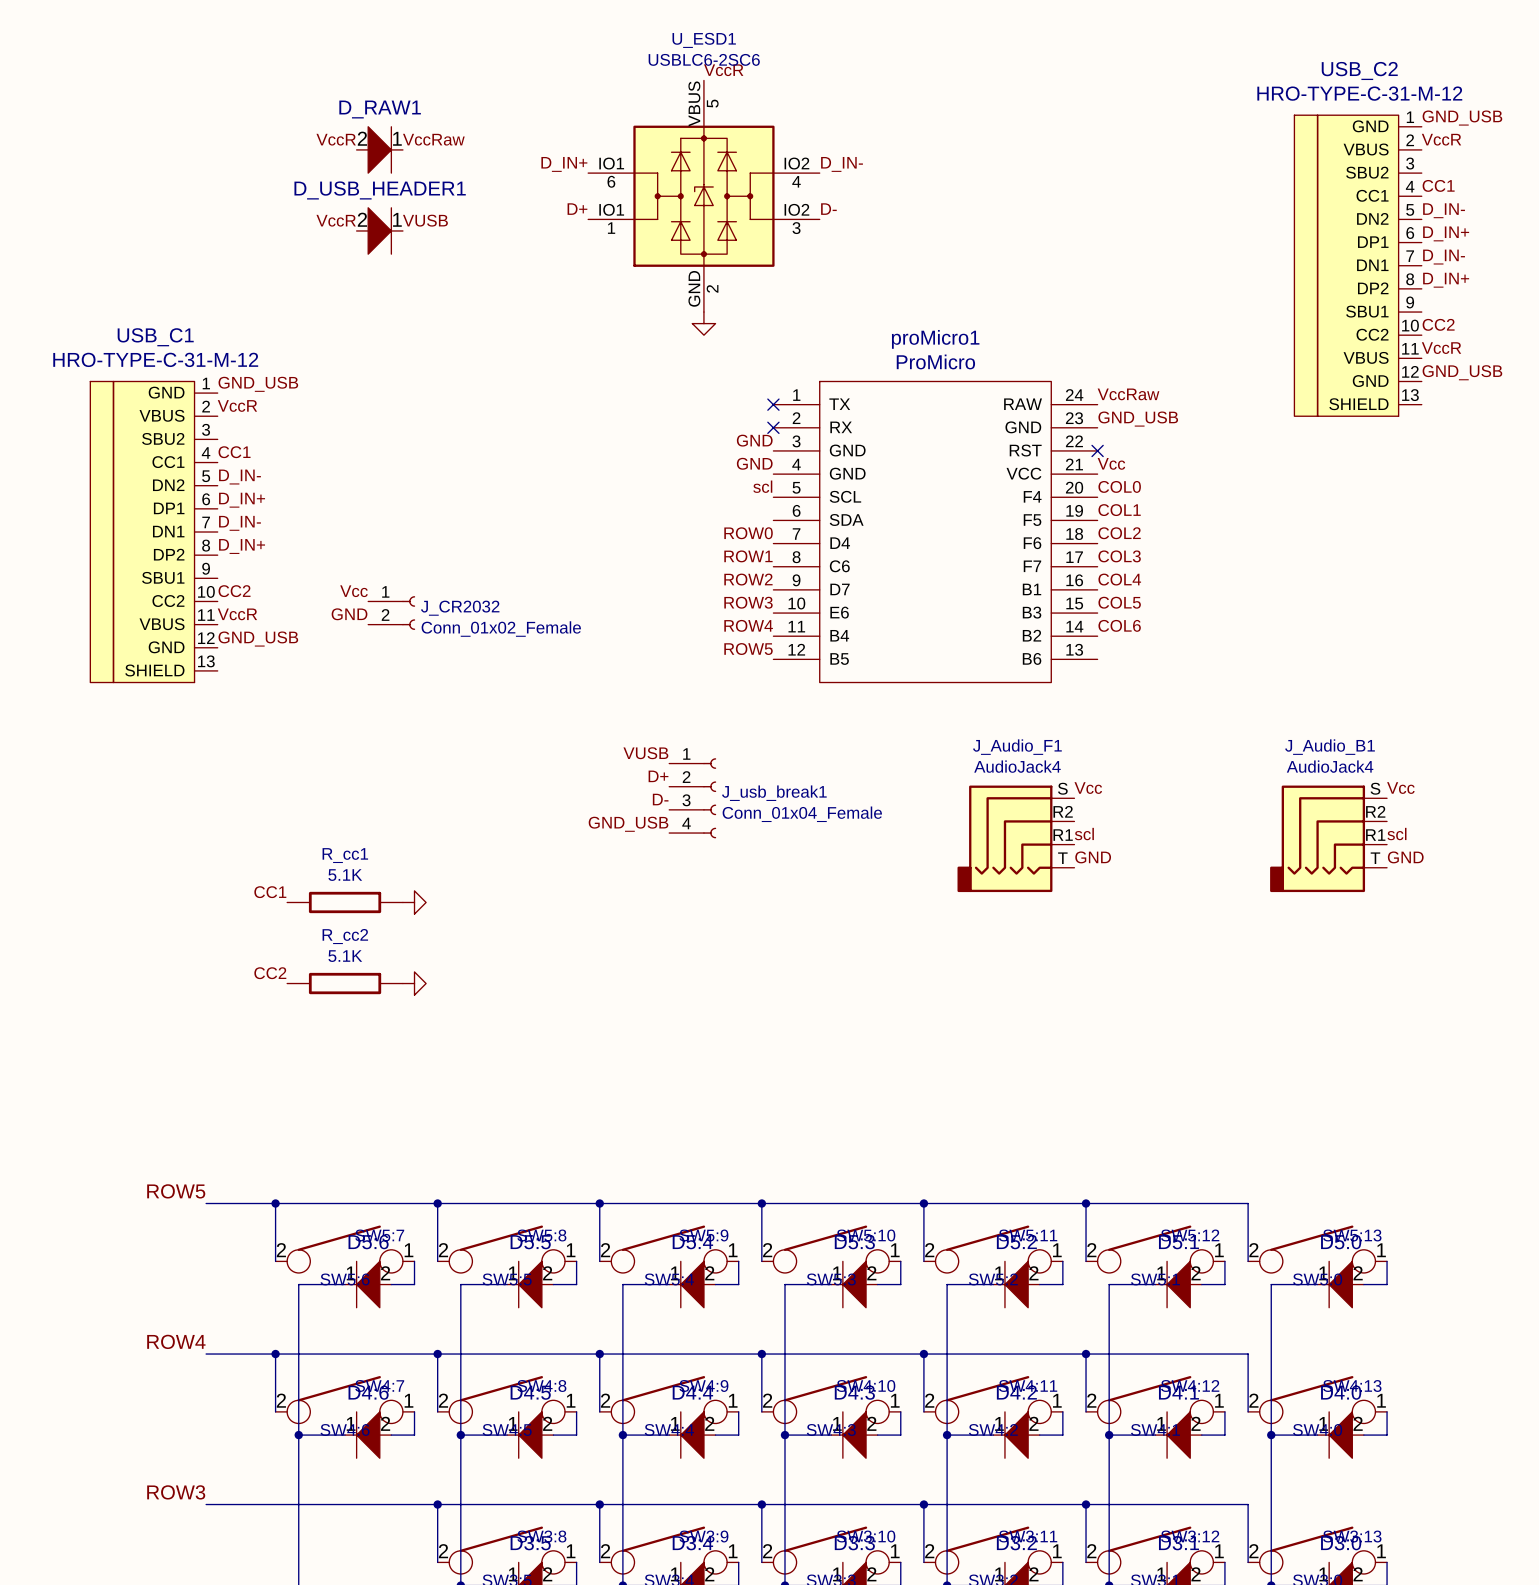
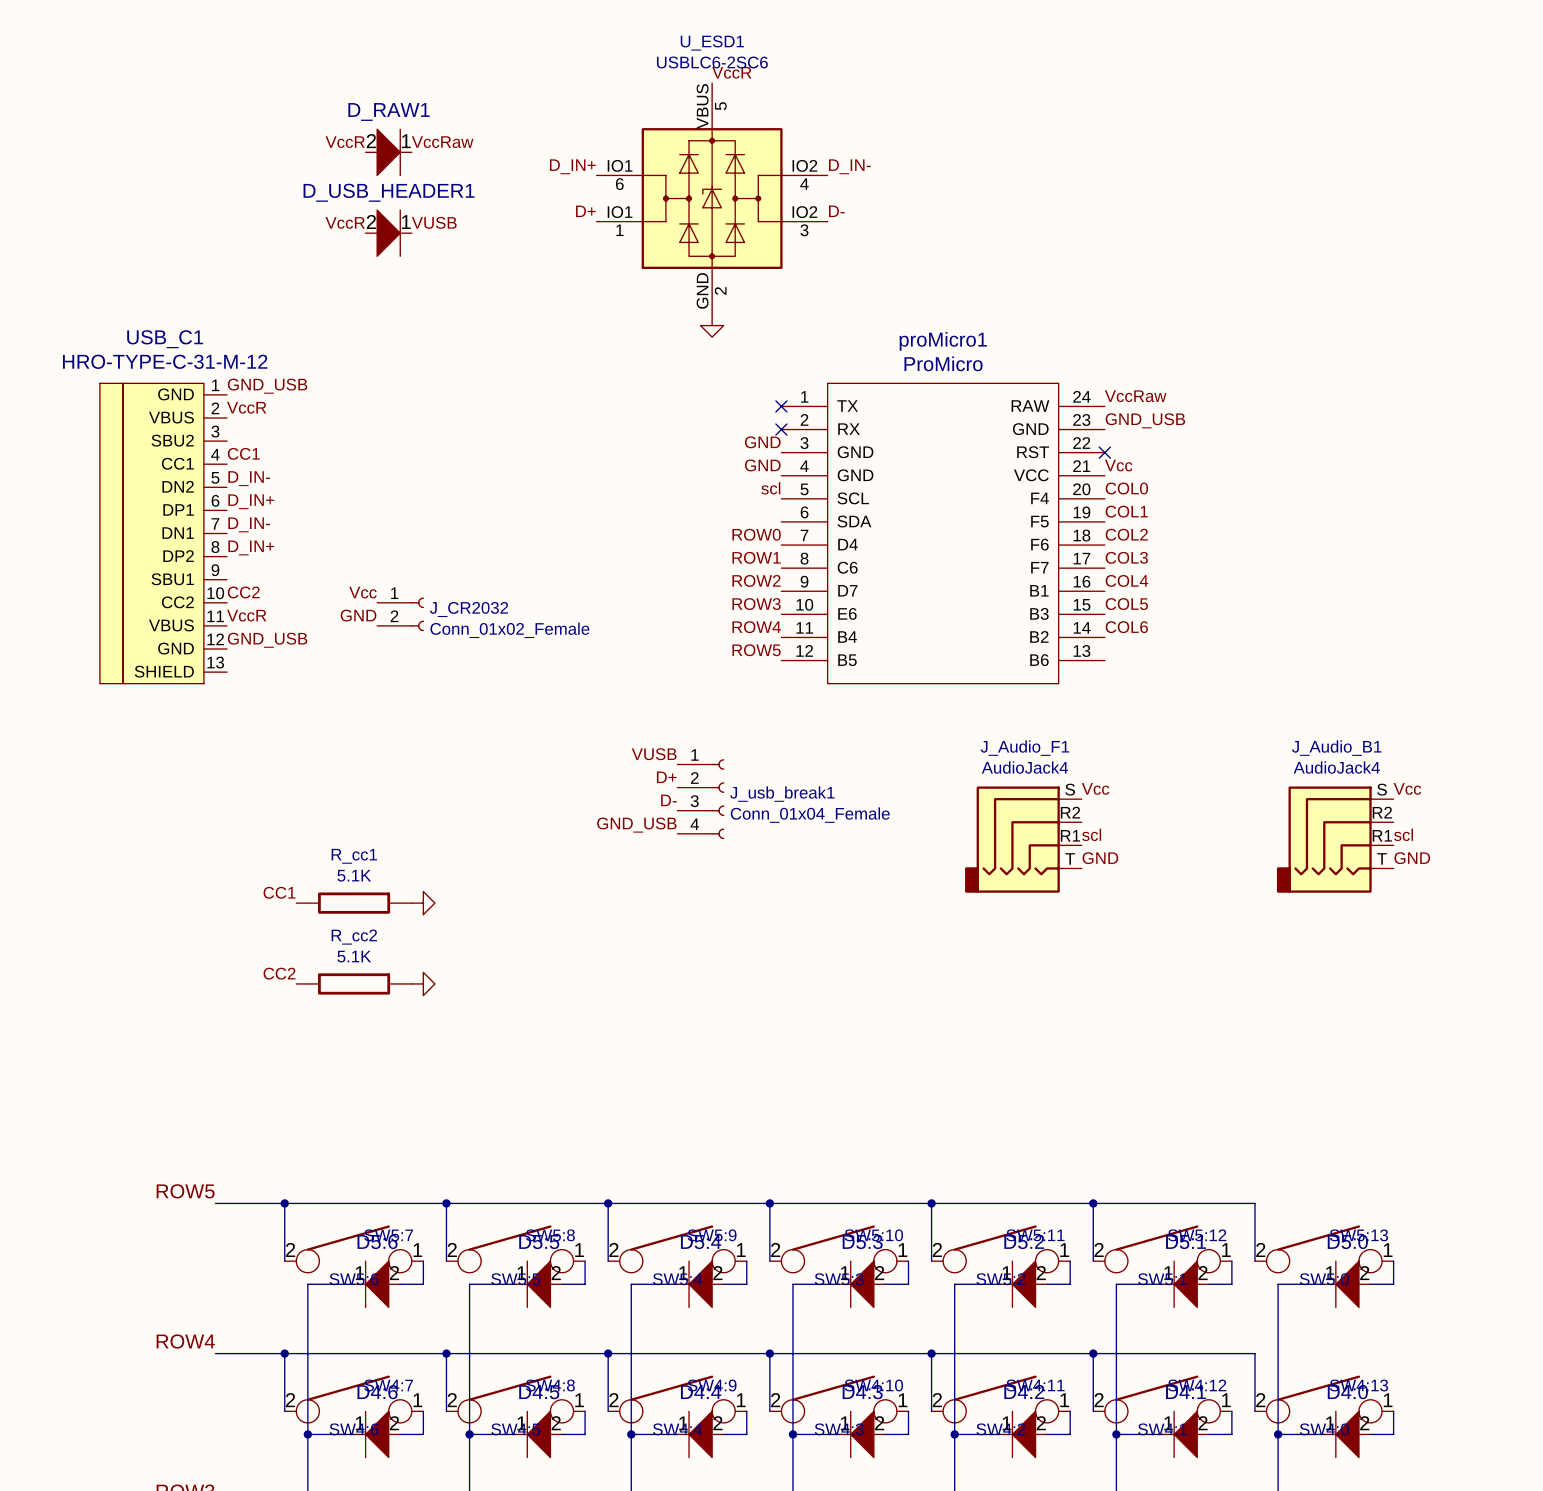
label: GND_USB (1462, 118) -> none
label: VccR (1441, 139) -> none
label: CC1 (1438, 185) -> none
label: D_IN- (1444, 210) -> none
label: D_IN+ (1446, 233) -> none
label: D_IN- (1444, 257) -> none
USB_C2: HRO-TYPE-C-31-M-12 (1358, 265) -> none
label: D_IN+ (1446, 280) -> none
label: CC2 (1438, 324) -> none
label: VccR (1441, 348) -> none
label: GND_USB (1462, 372) -> none

